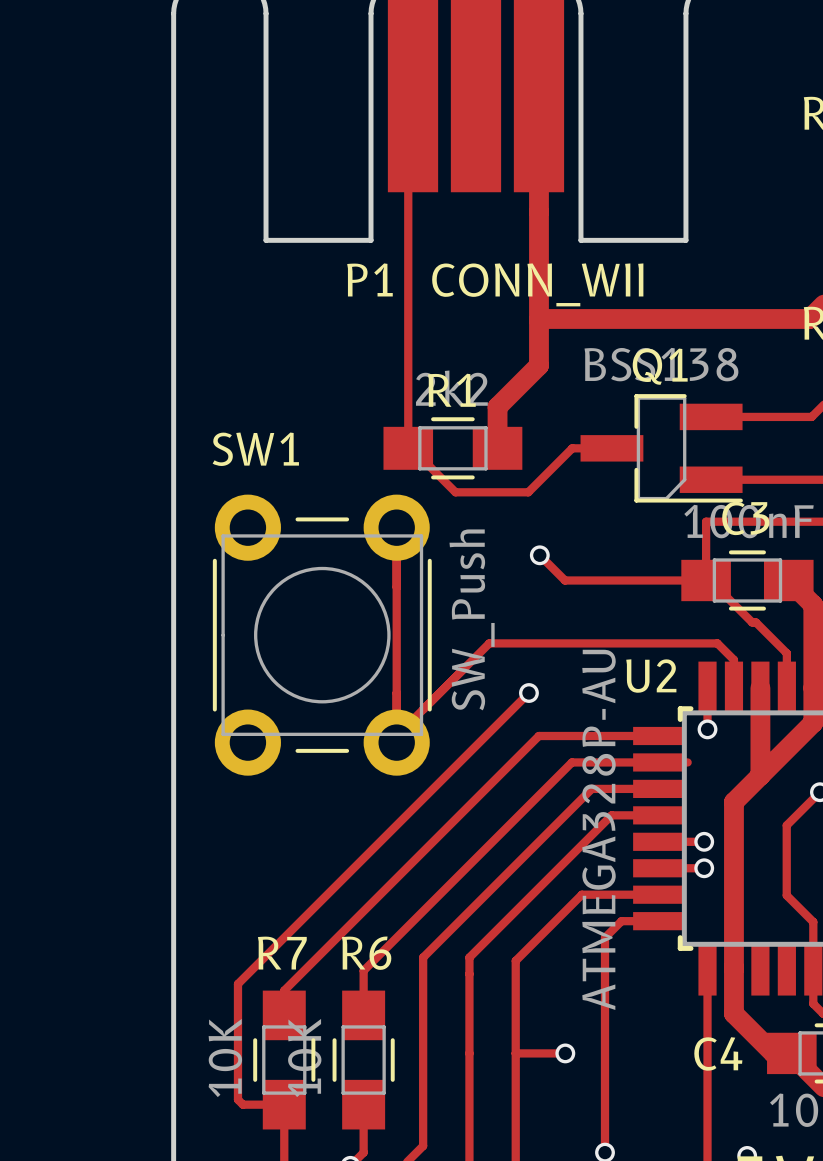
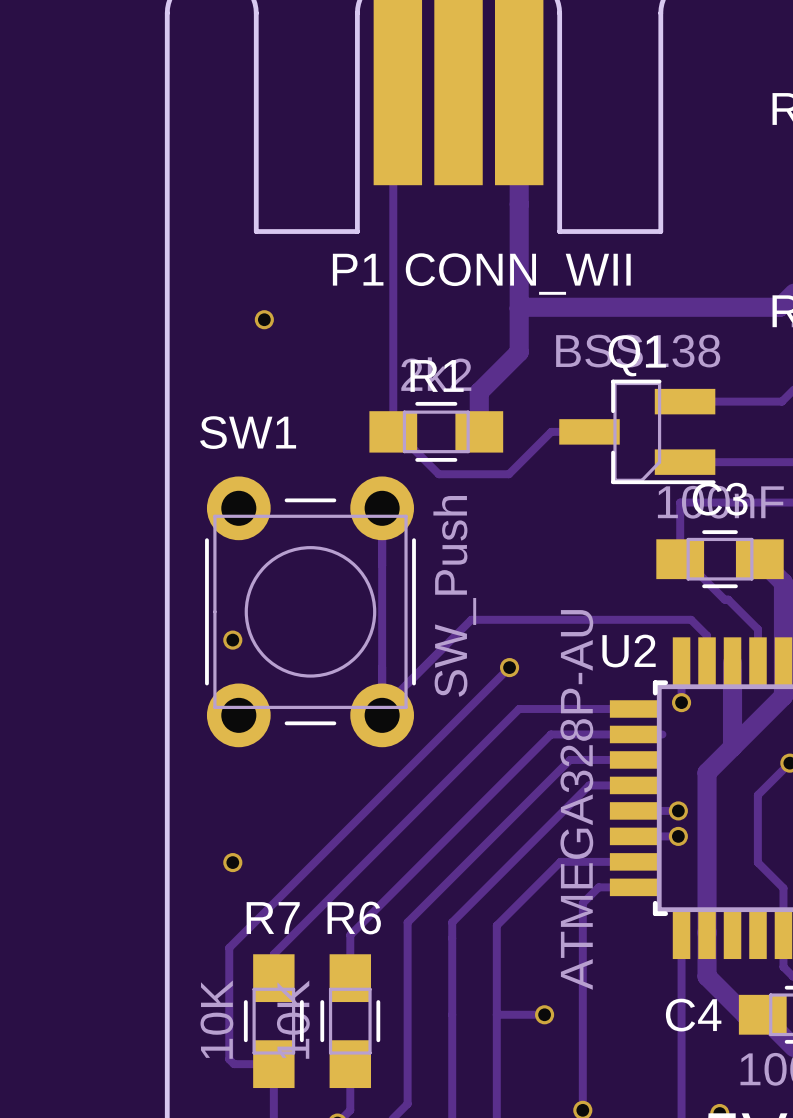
via: none -> (264, 319)
track: (539, 555) (565, 580) (706, 580) -> none
via: (539, 555) -> none
via: none -> (232, 640)
via: none -> (232, 862)

